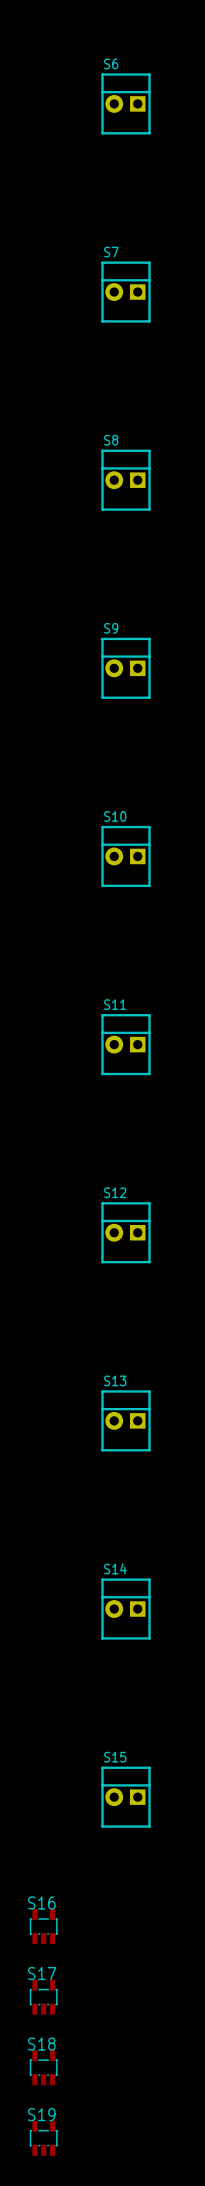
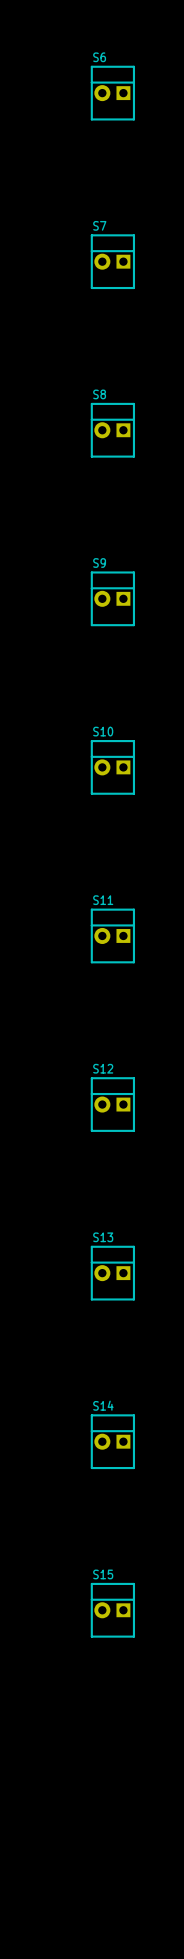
S16: (43, 1926) -> none
S17: (43, 1997) -> none
S18: (43, 2067) -> none
S19: (43, 2138) -> none

